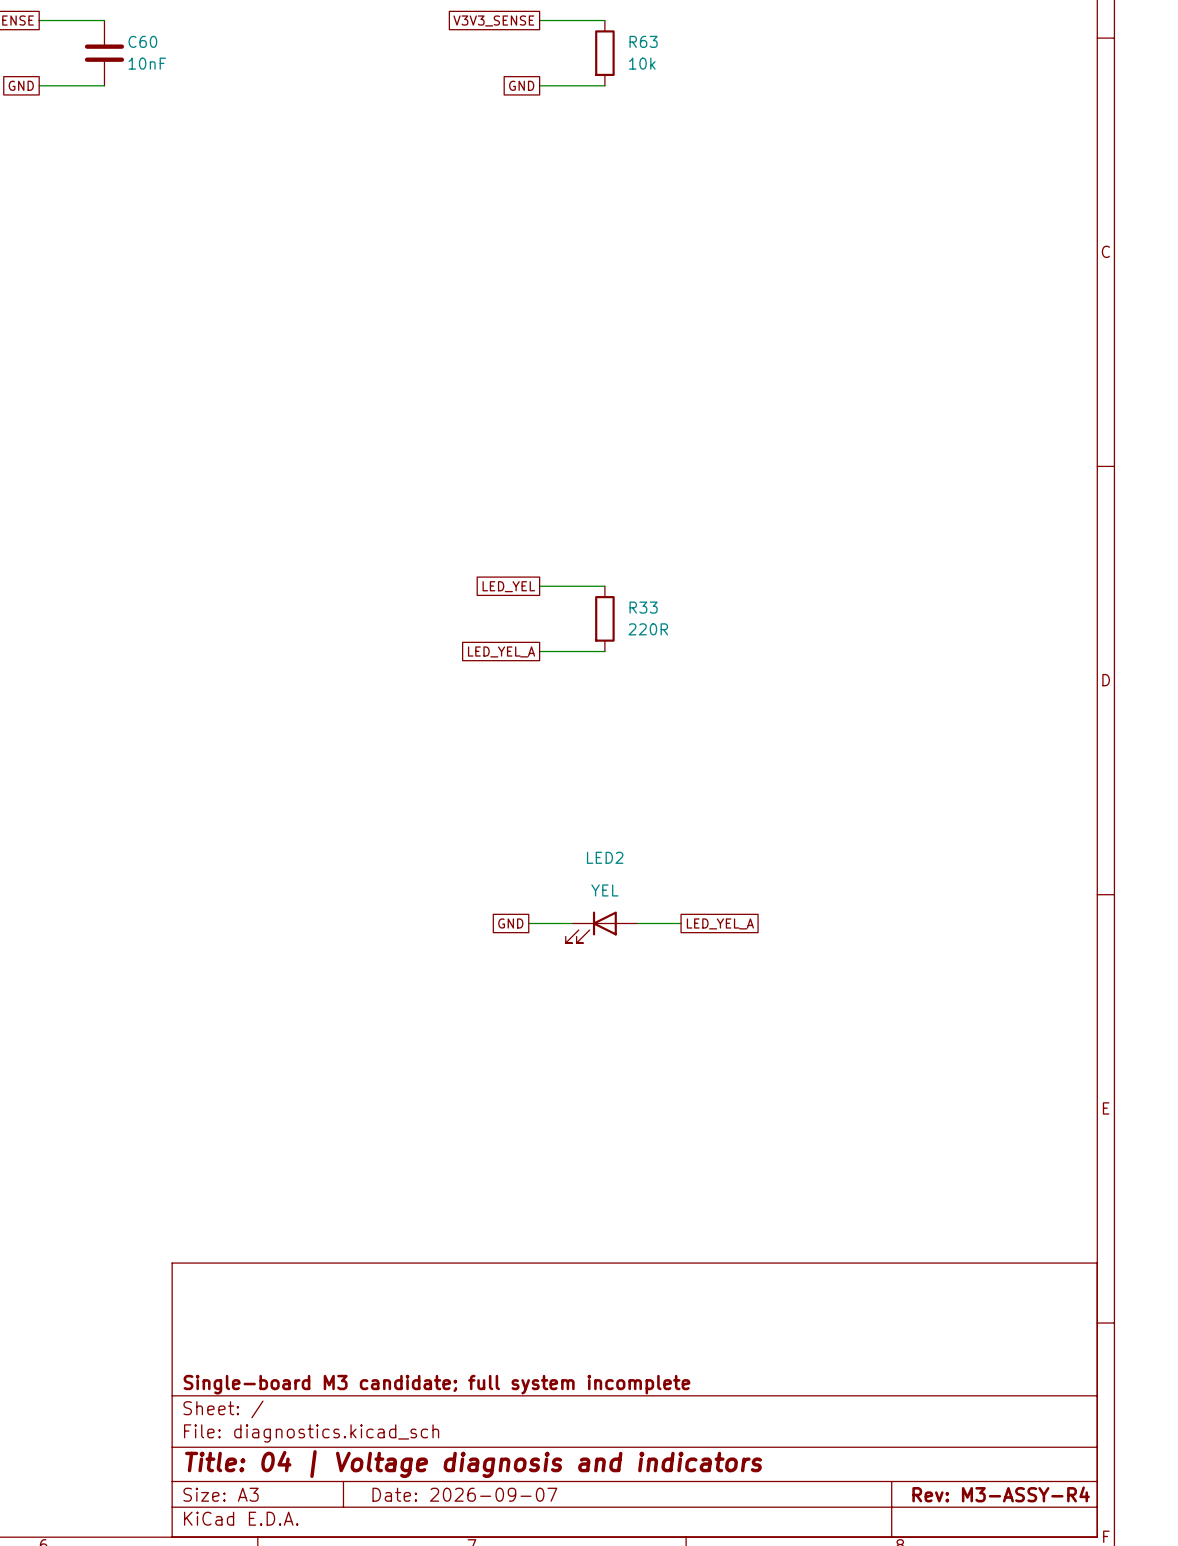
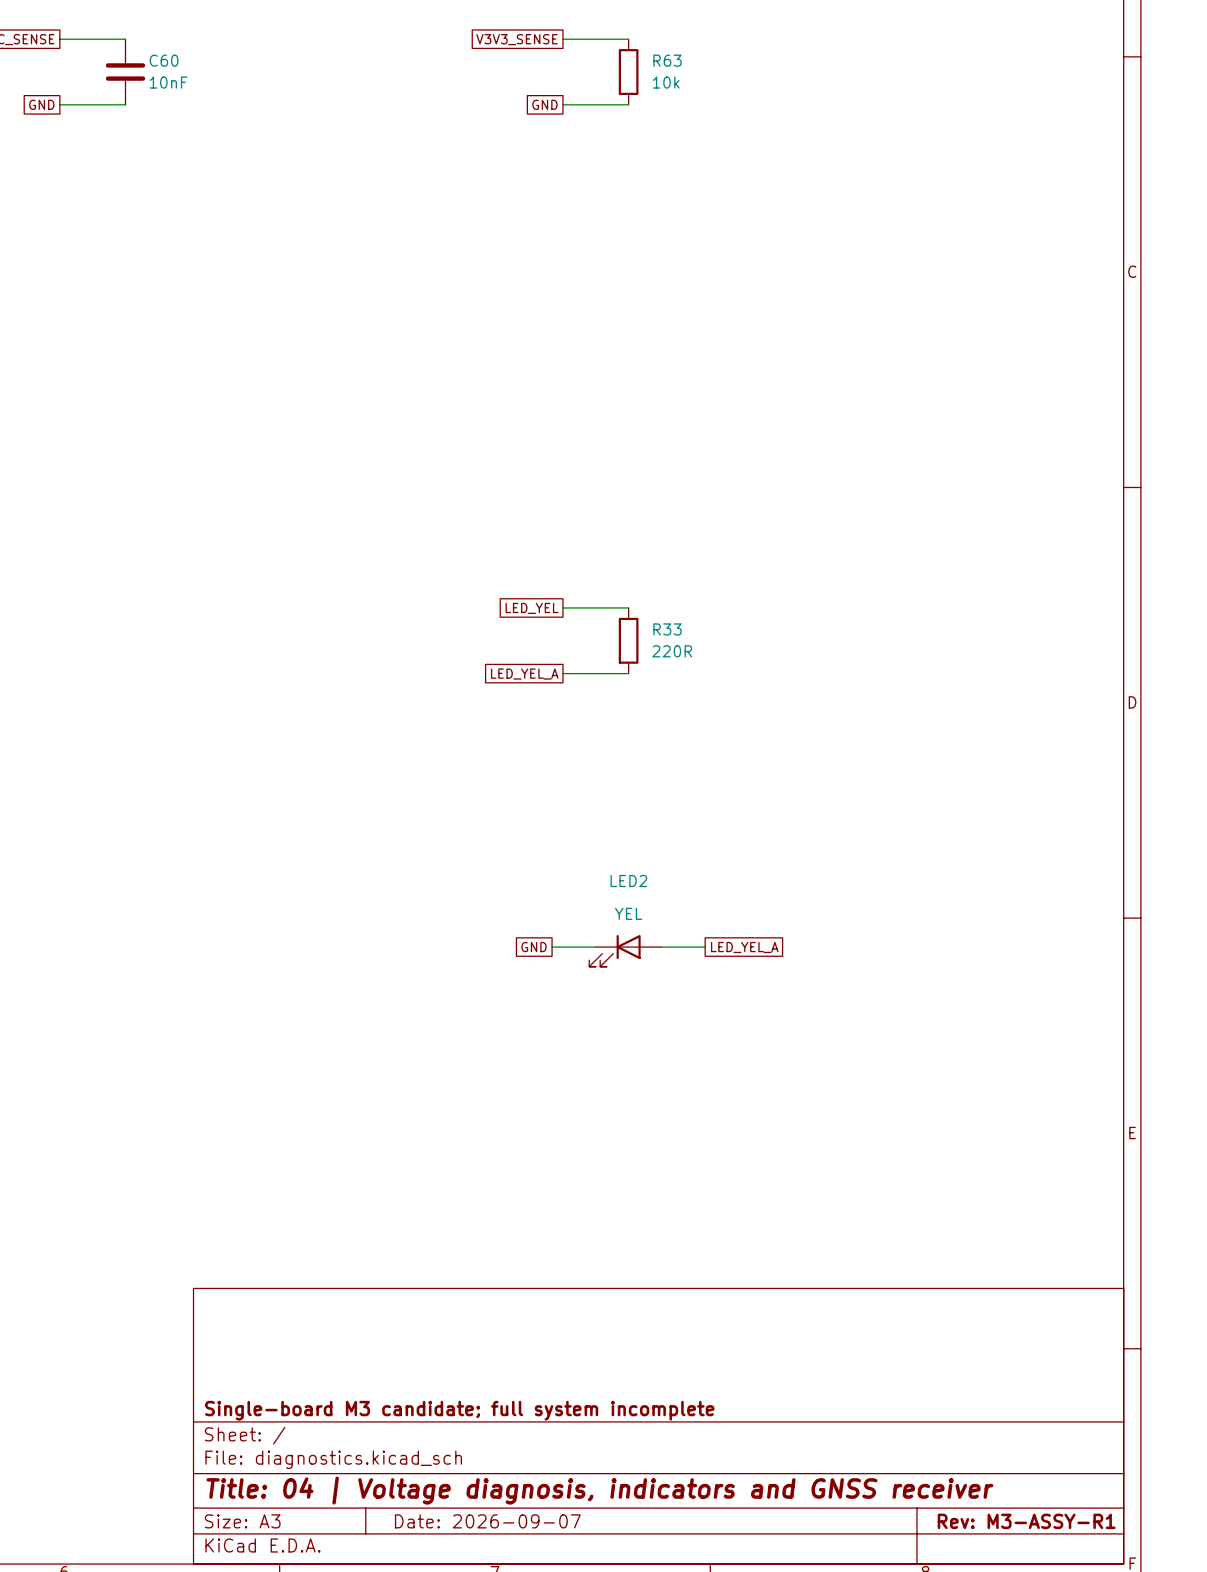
title block: Title: 04 | Voltage diagnosis and indicators (473, 1464) -> Title: 04 | Voltage diagnosis, indicators and GNSS receiver (599, 1490)
title block: Rev: M3-ASSY-R4 (1001, 1494) -> Rev: M3-ASSY-R1 (1026, 1521)

